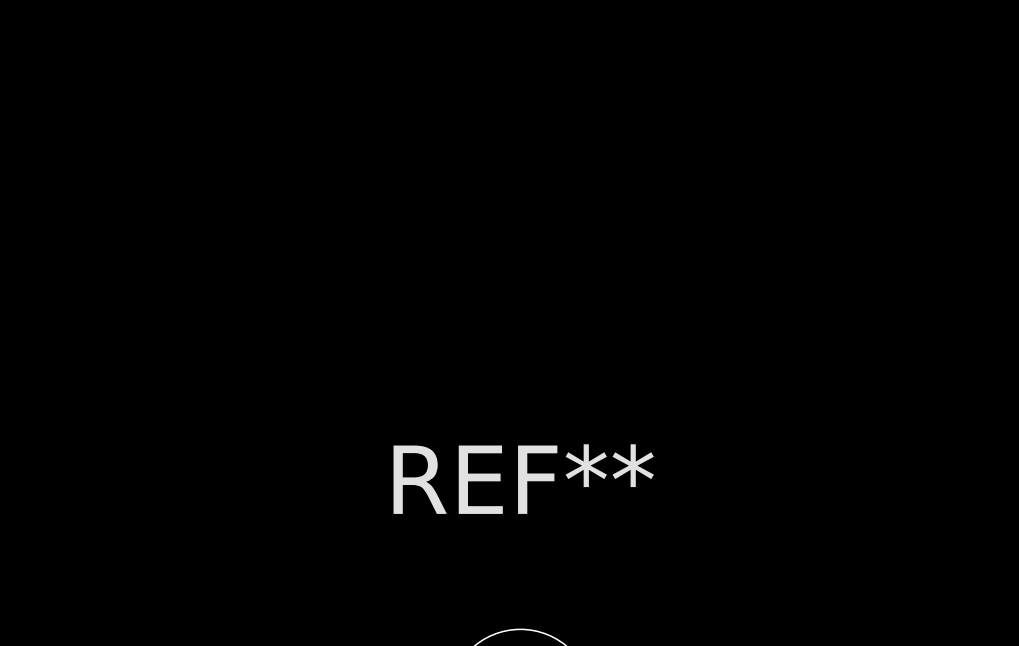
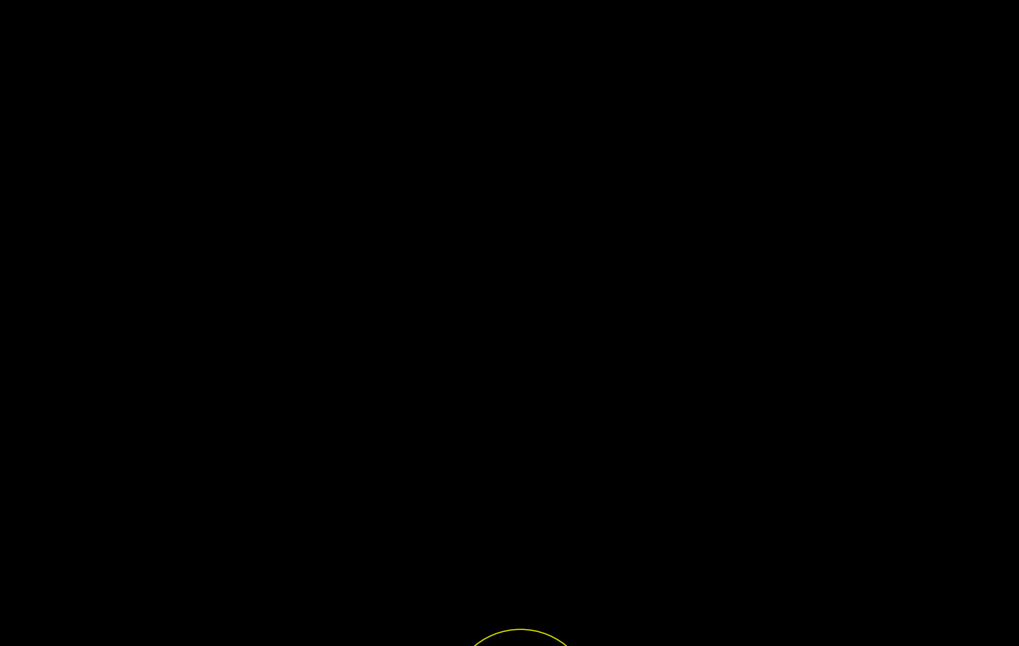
REF** name: REF** (523, 479) -> none

